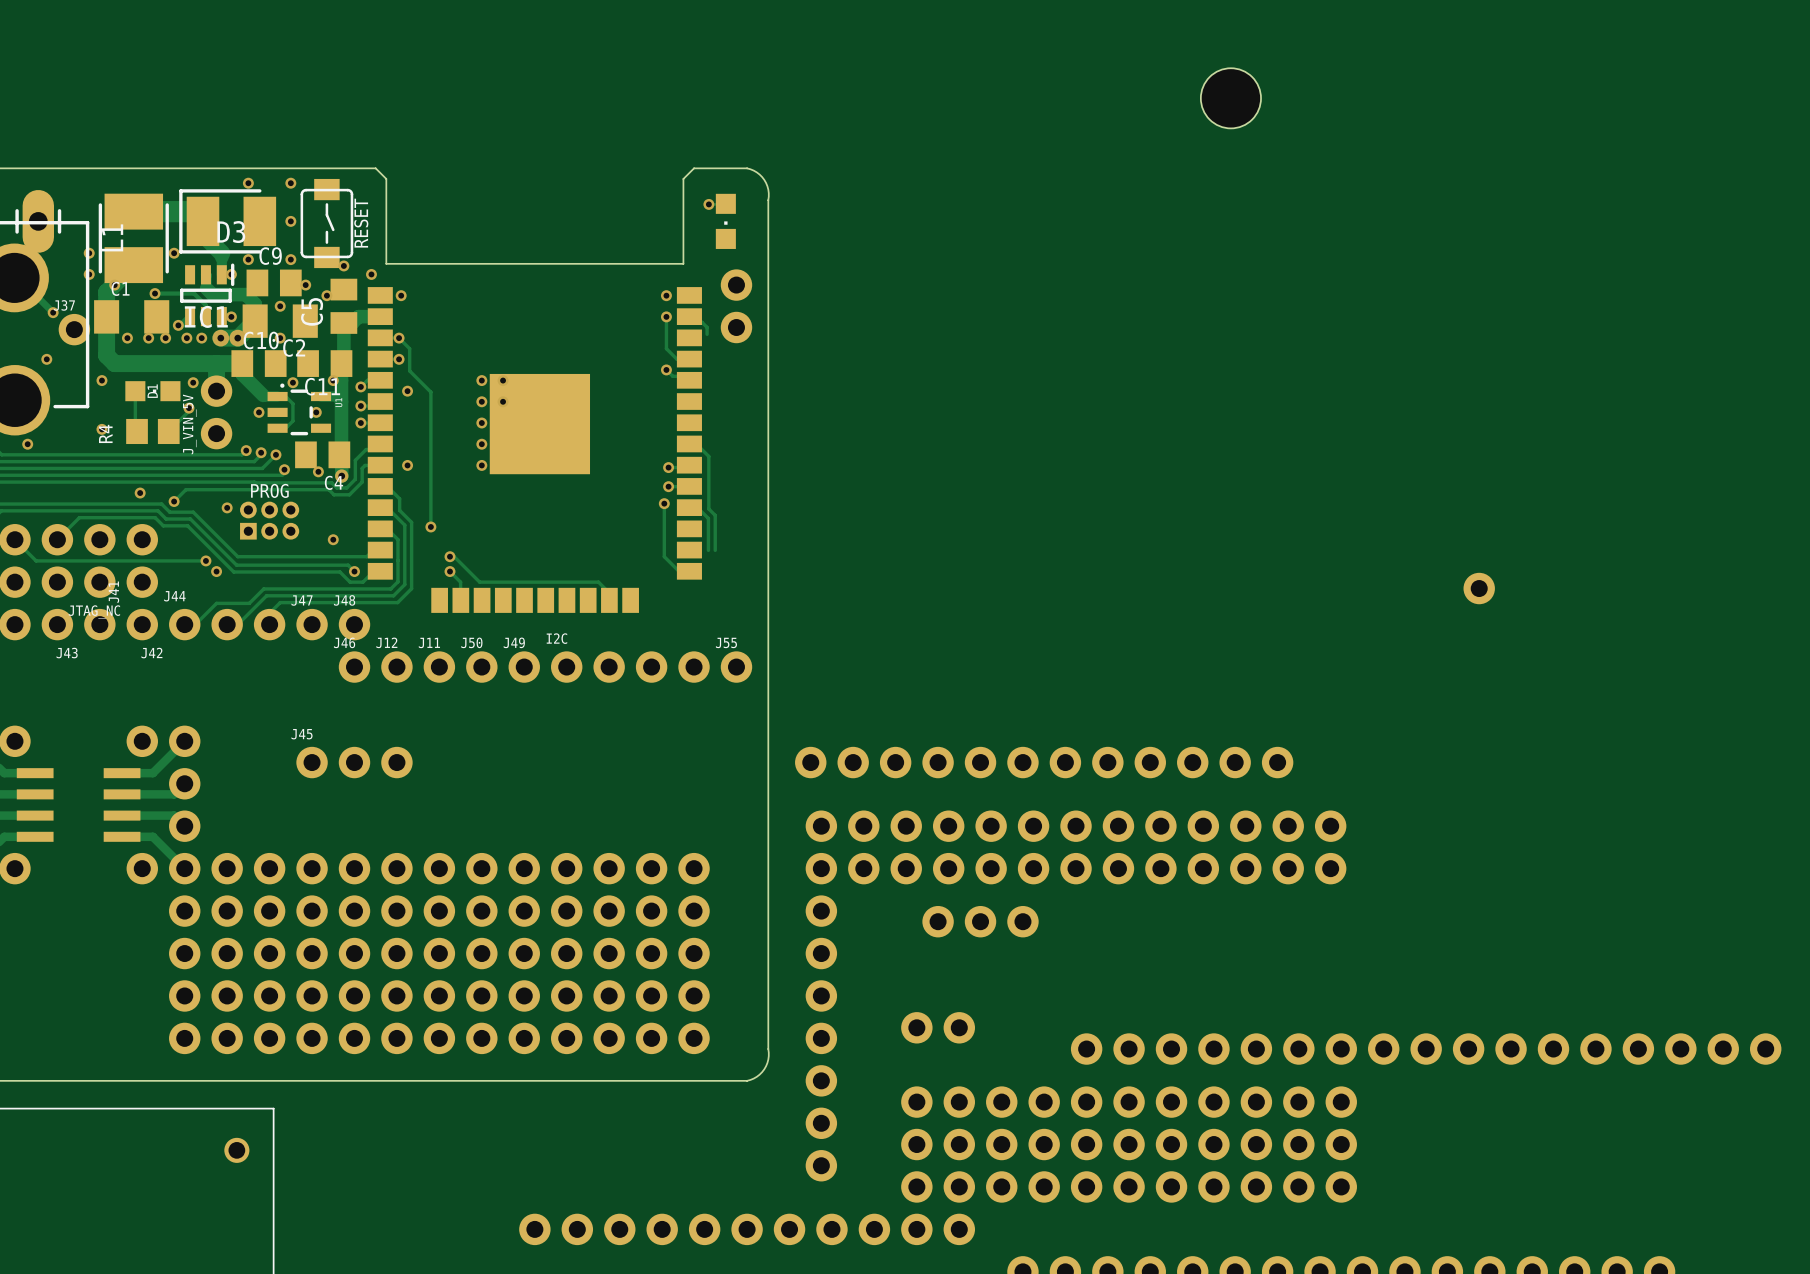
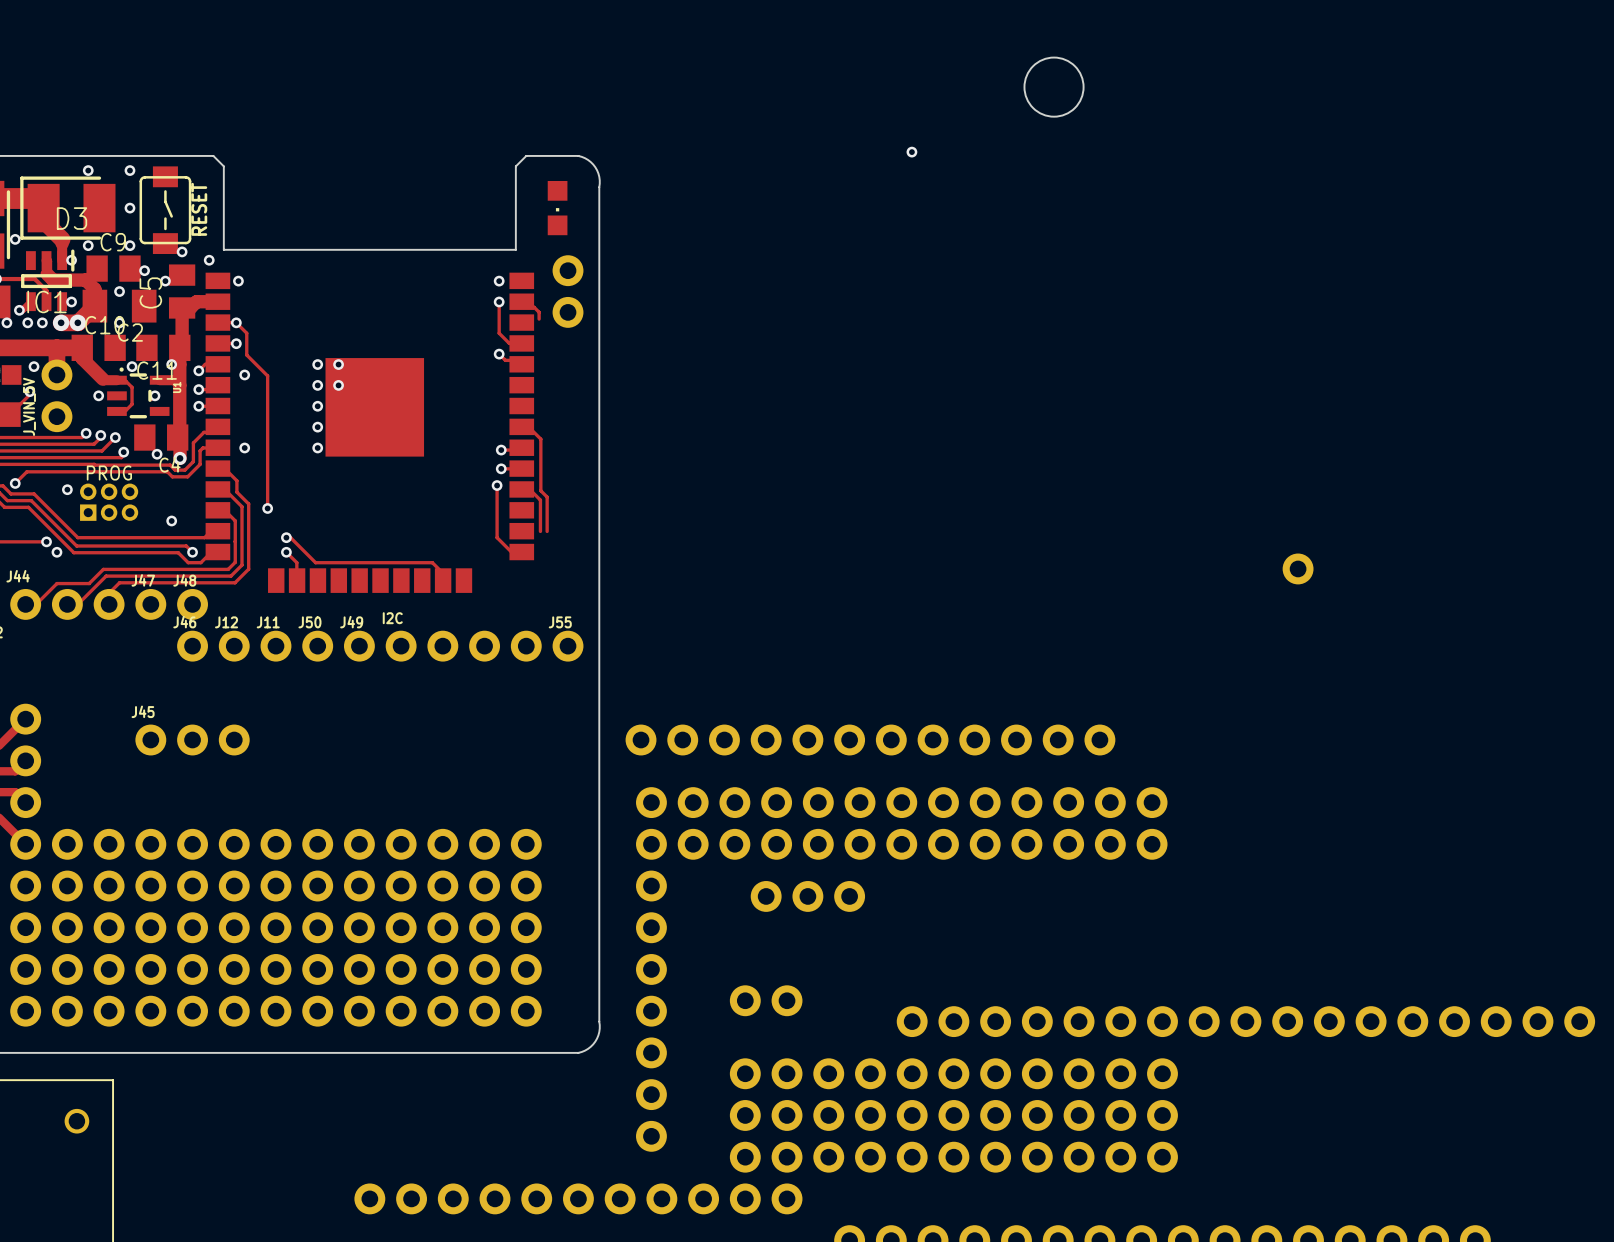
via: none -> (911, 152)
via: (708, 204) -> none

